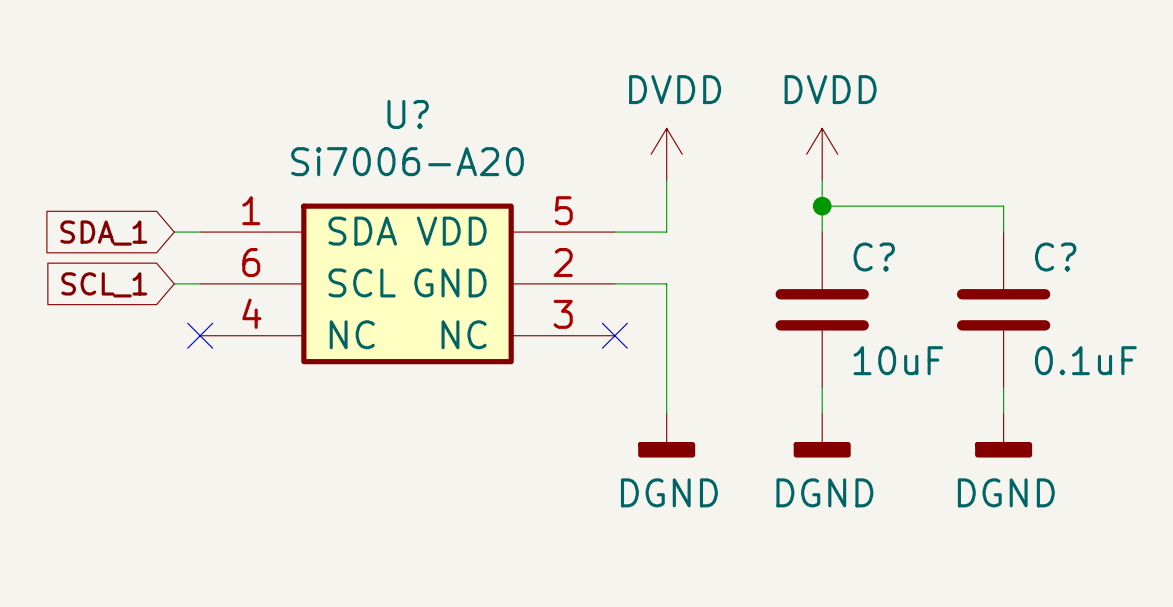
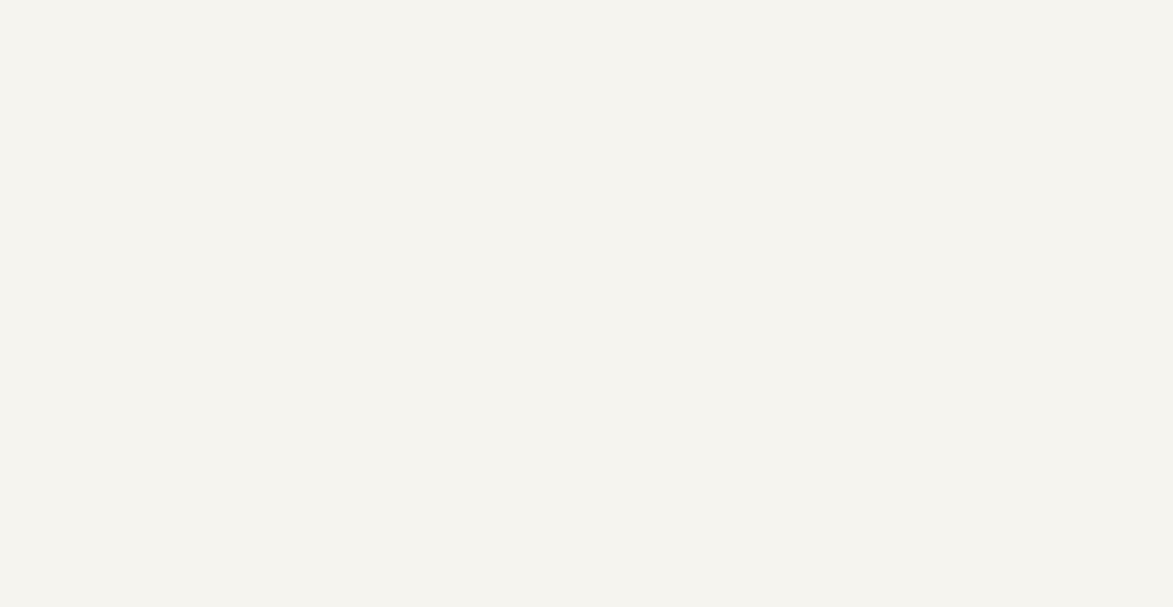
power symbol: DVDD (666, 154) -> none
power symbol: DVDD (822, 154) -> none
wire: (666, 180) (666, 232) (614, 232) -> none
wire: (822, 180) (822, 232) -> none
wire: (822, 206) (1003, 206) (1003, 232) -> none
junction: (822, 206) -> none
wire: (174, 232) (200, 232) -> none
global label: SDA_1 (103, 233) -> none
wire: (174, 283) (200, 283) -> none
U?: Si7006-A20 (407, 283) -> none
wire: (614, 283) (666, 283) (666, 413) -> none
global label: SCL_1 (104, 284) -> none
C?: 10uF (822, 309) -> none
C?: 0.1uF (1003, 309) -> none
no-connect mark: (200, 335) -> none
no-connect mark: (614, 335) -> none
wire: (822, 387) (822, 413) -> none
wire: (1003, 387) (1003, 413) -> none
power symbol: DGND (666, 435) -> none
power symbol: DGND (822, 435) -> none
power symbol: DGND (1003, 435) -> none

